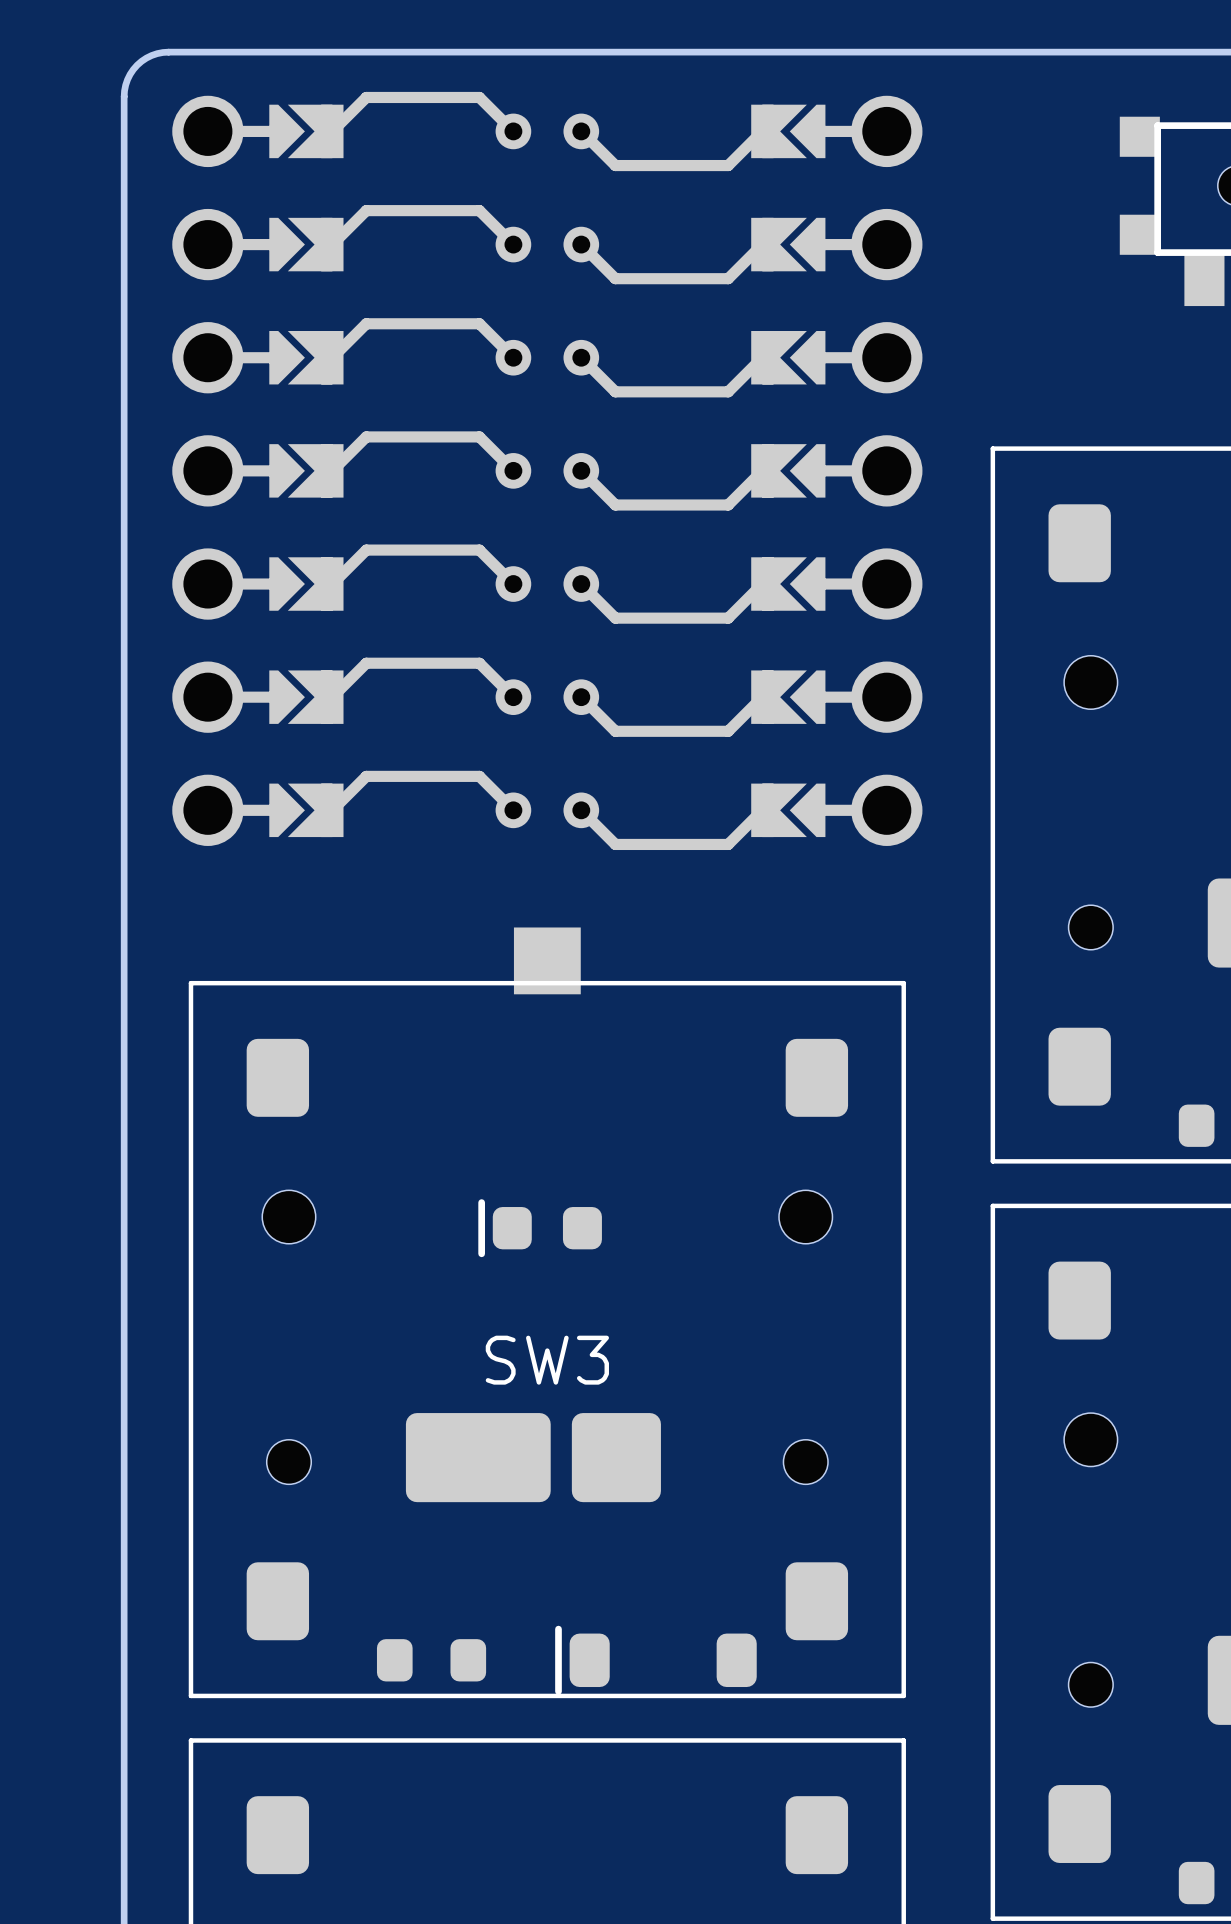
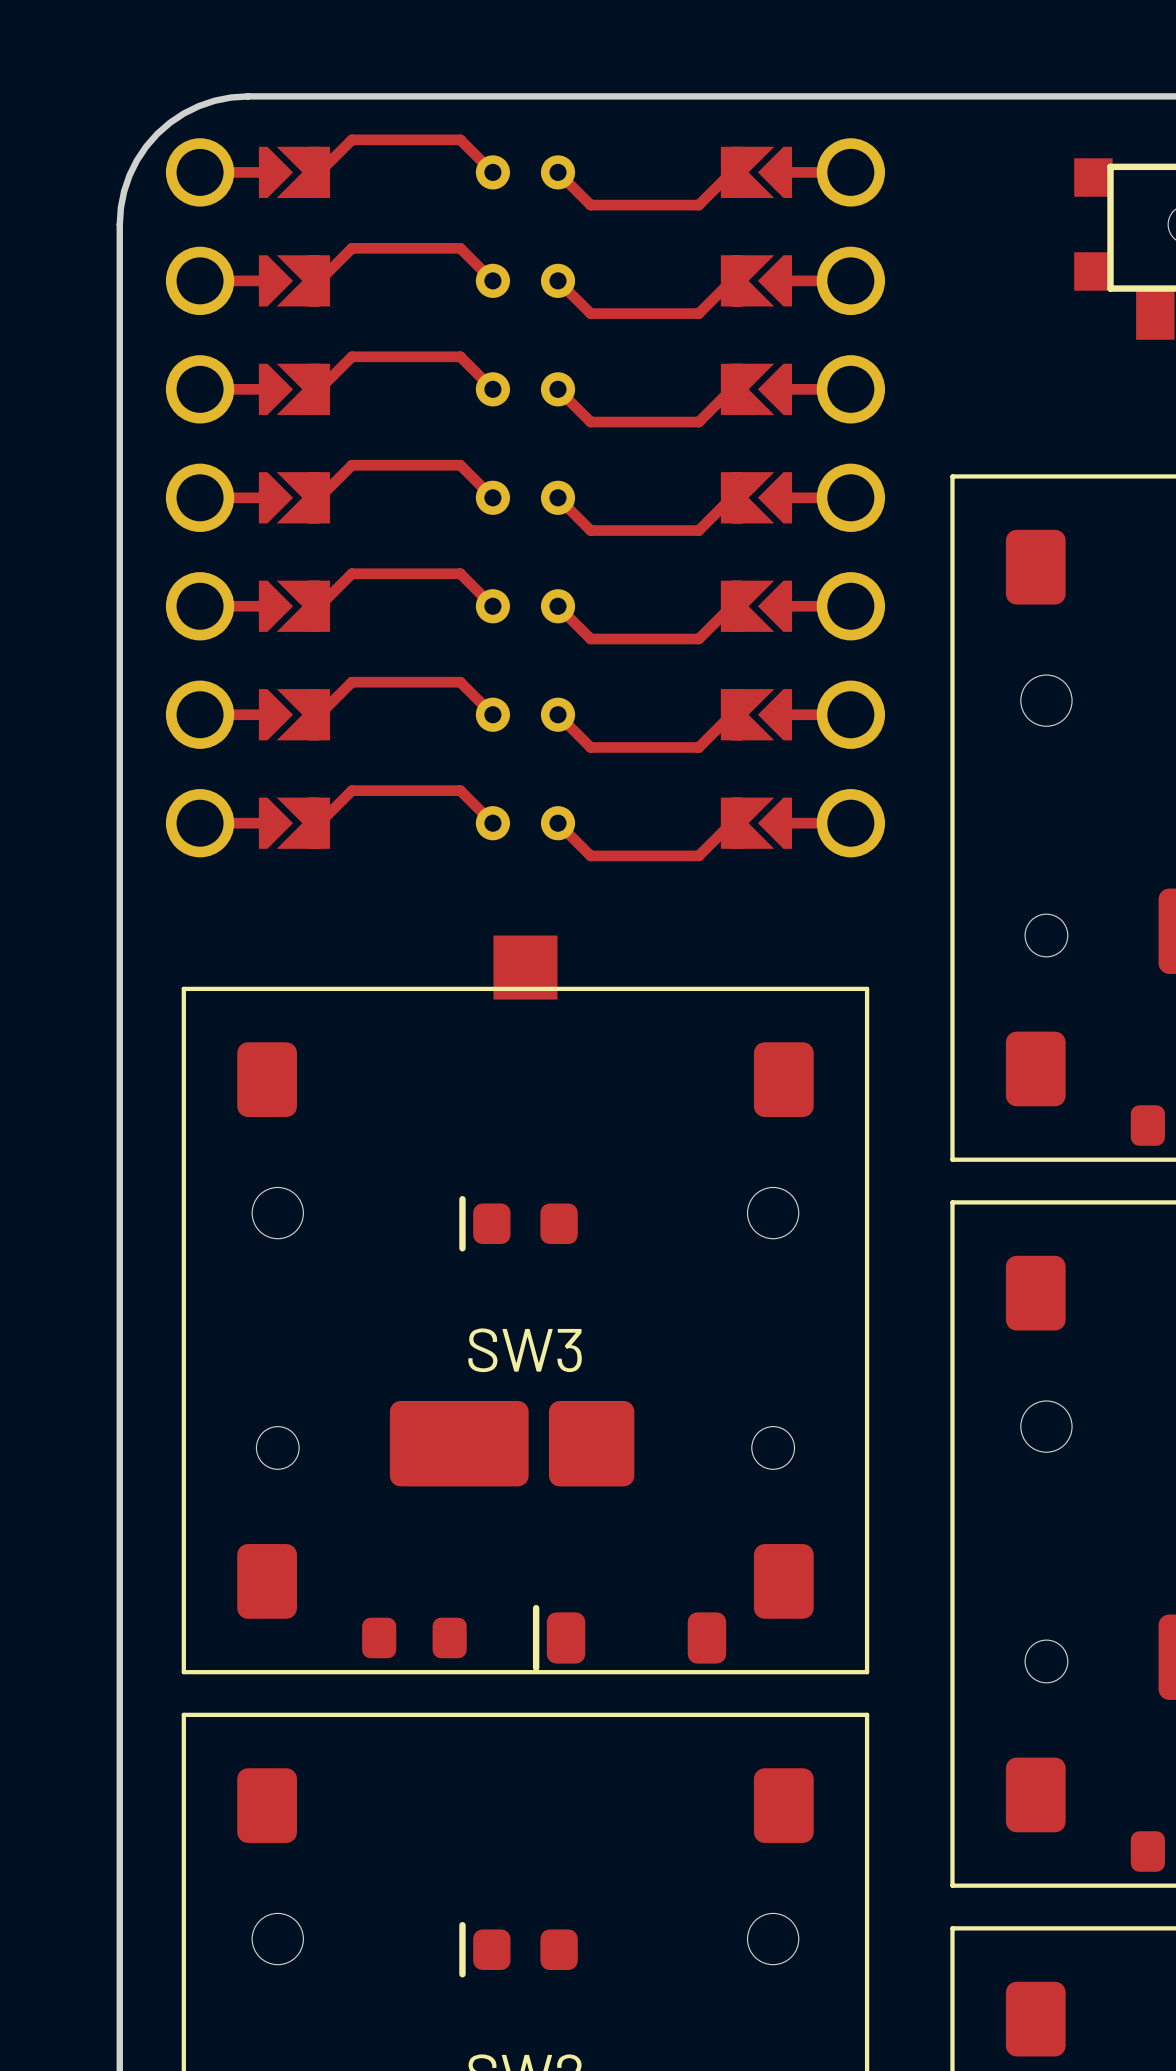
board edge: (257, 52) (162, 52) (146, 58) (137, 65) (130, 74) (124, 90) (124, 185) -> (247, 96) (214, 100) (198, 106) (183, 113) (157, 133) (146, 146) (129, 175) (120, 207) (119, 224)

